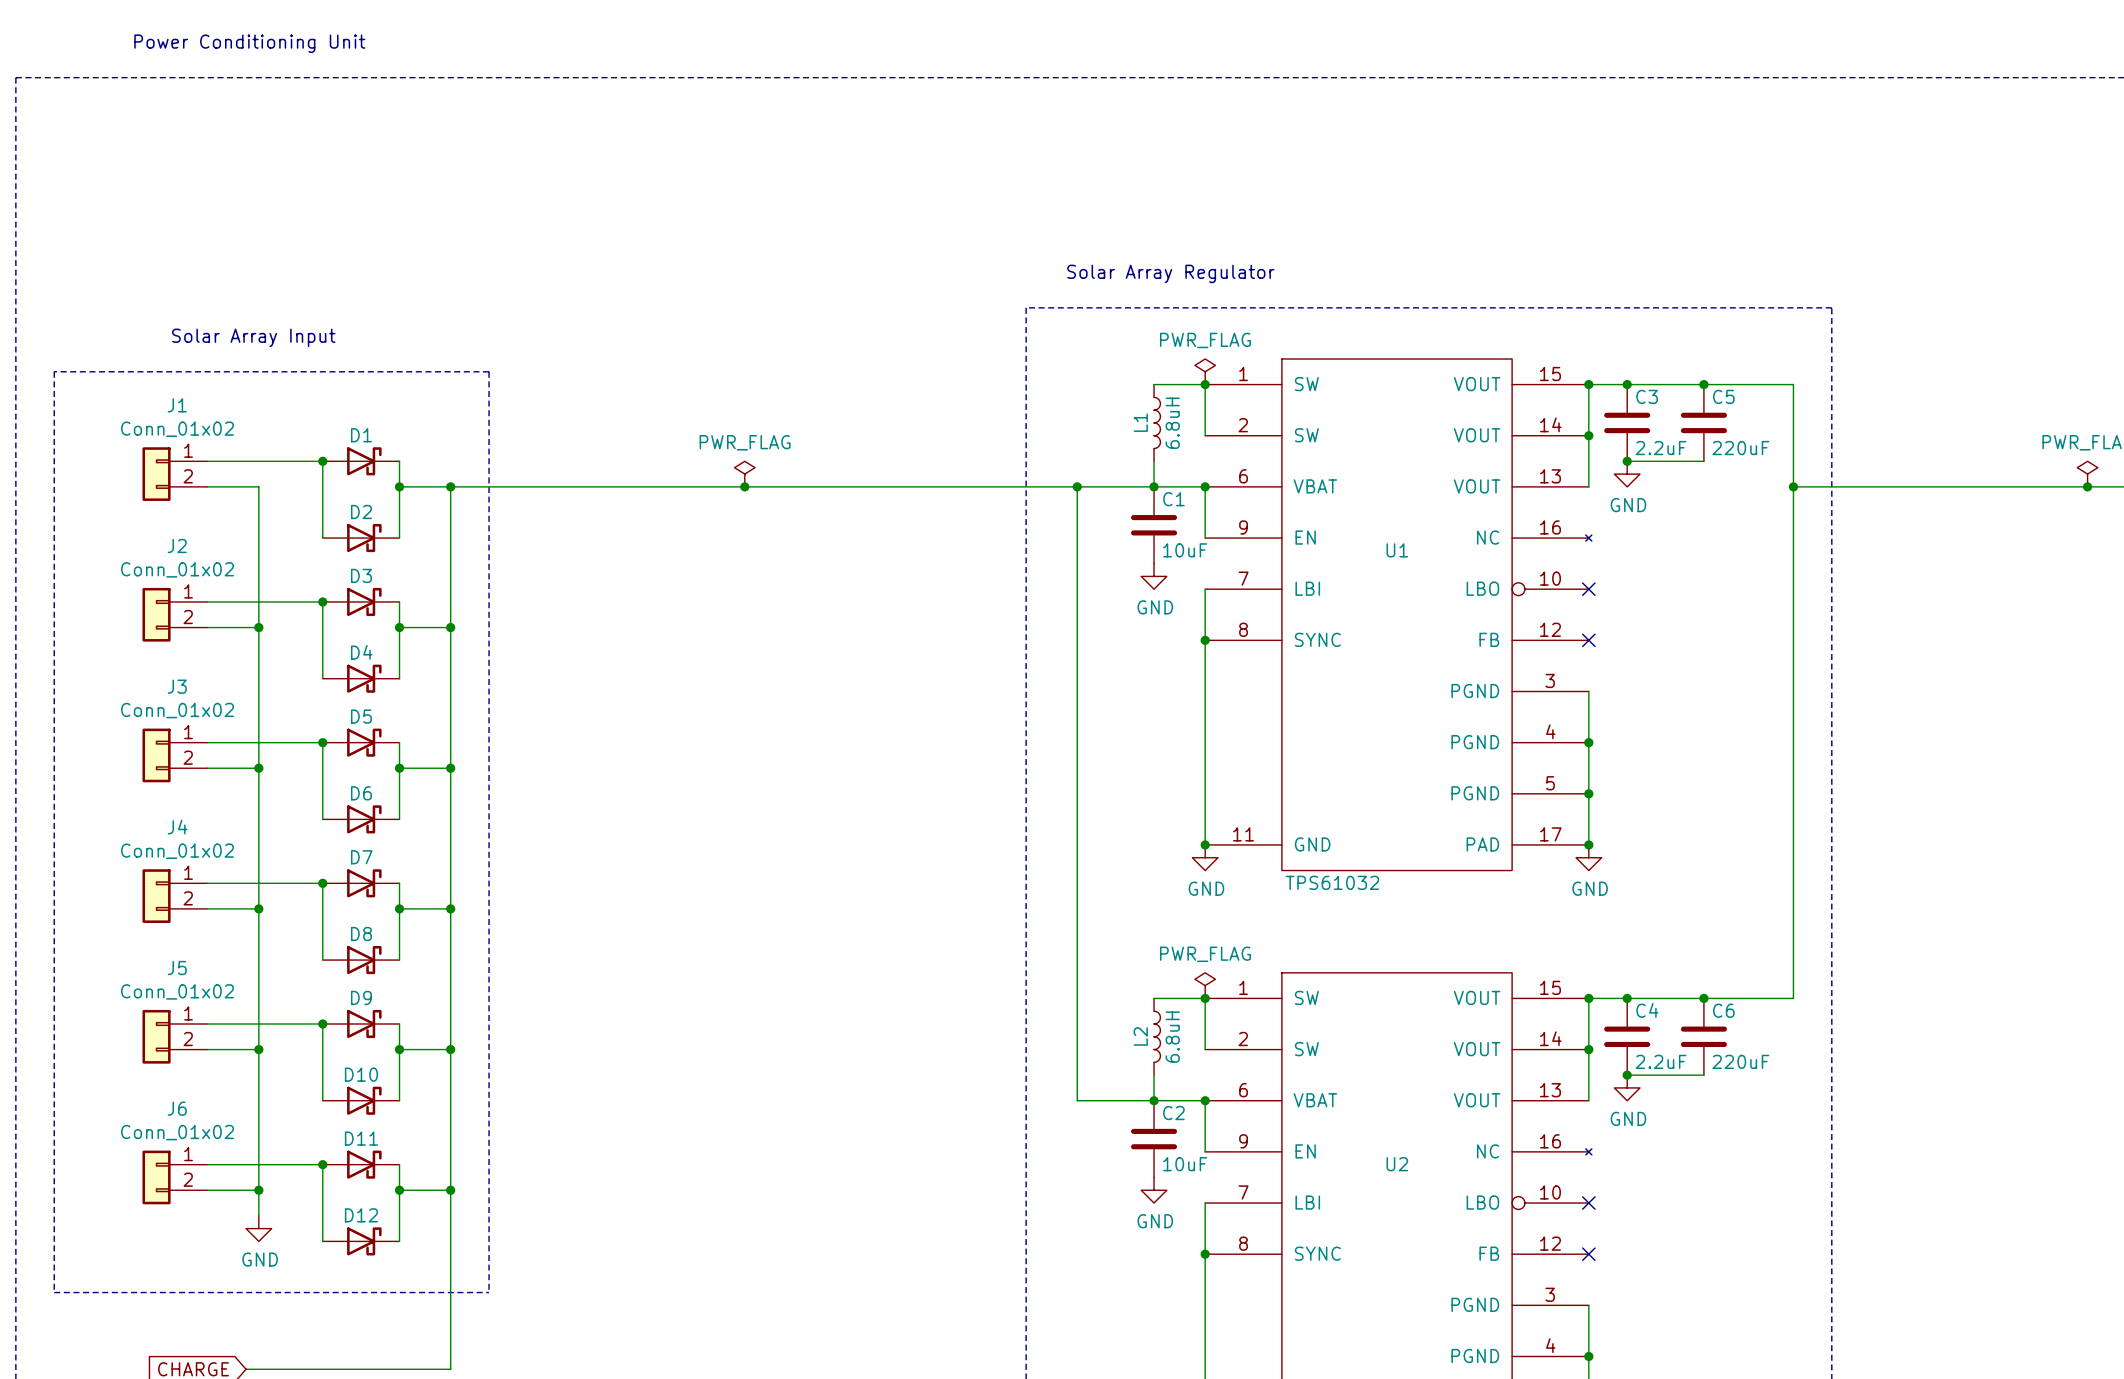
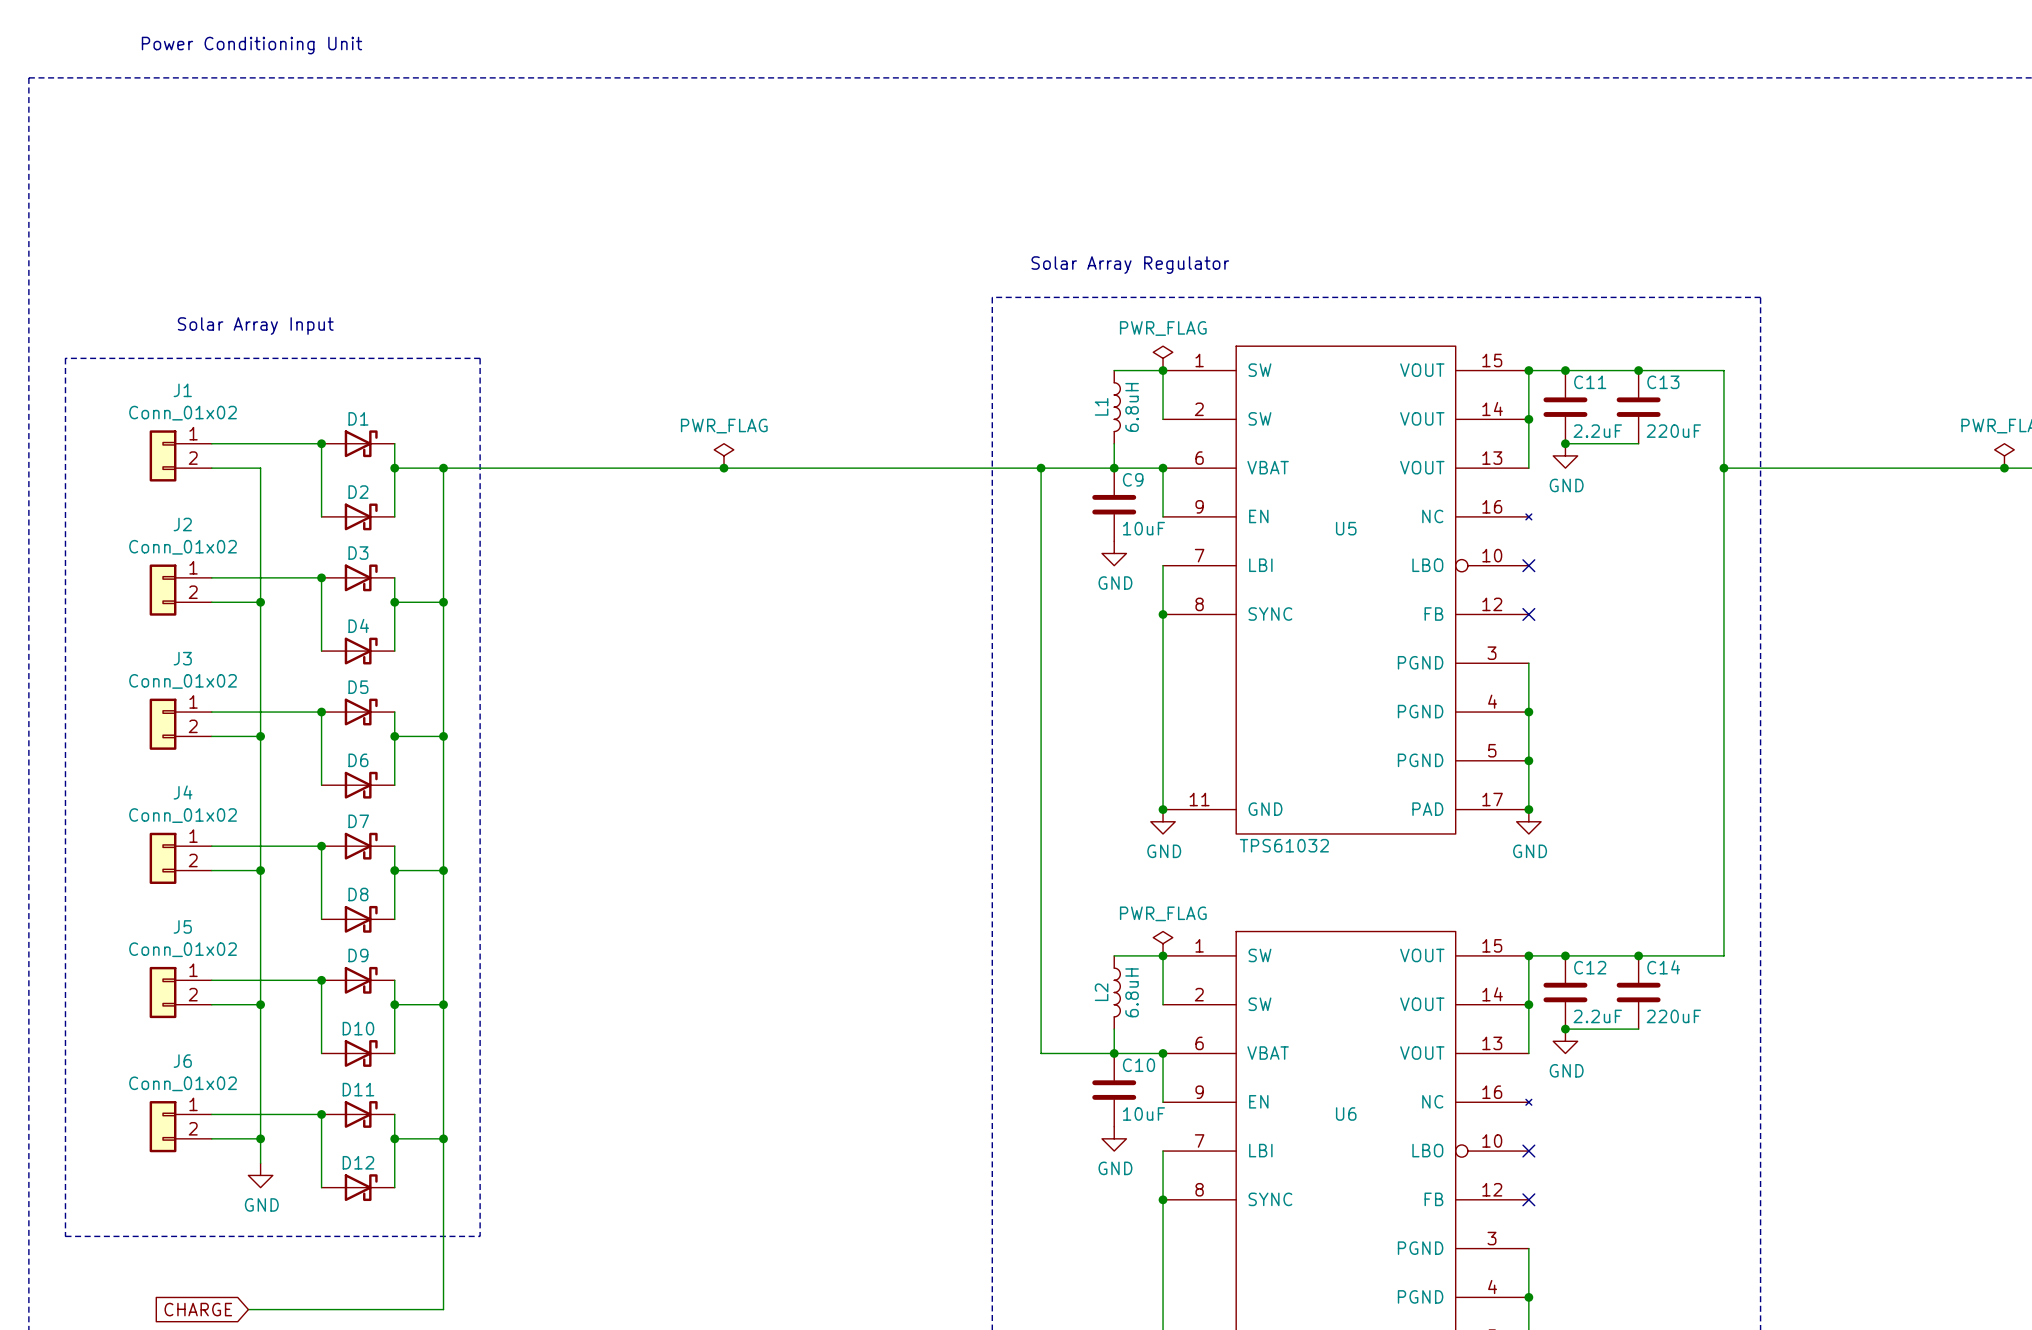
C3 name: C3 (1647, 396) -> C11 (1590, 382)
C5 name: C5 (1723, 396) -> C13 (1663, 382)
C1 name: C1 (1173, 499) -> C9 (1133, 479)
U1 name: U1 (1397, 550) -> U5 (1346, 528)
C4 name: C4 (1647, 1010) -> C12 (1590, 967)
C6 name: C6 (1723, 1010) -> C14 (1663, 967)
C2 name: C2 (1173, 1113) -> C10 (1139, 1065)
U2 name: U2 (1397, 1164) -> U6 (1346, 1114)

